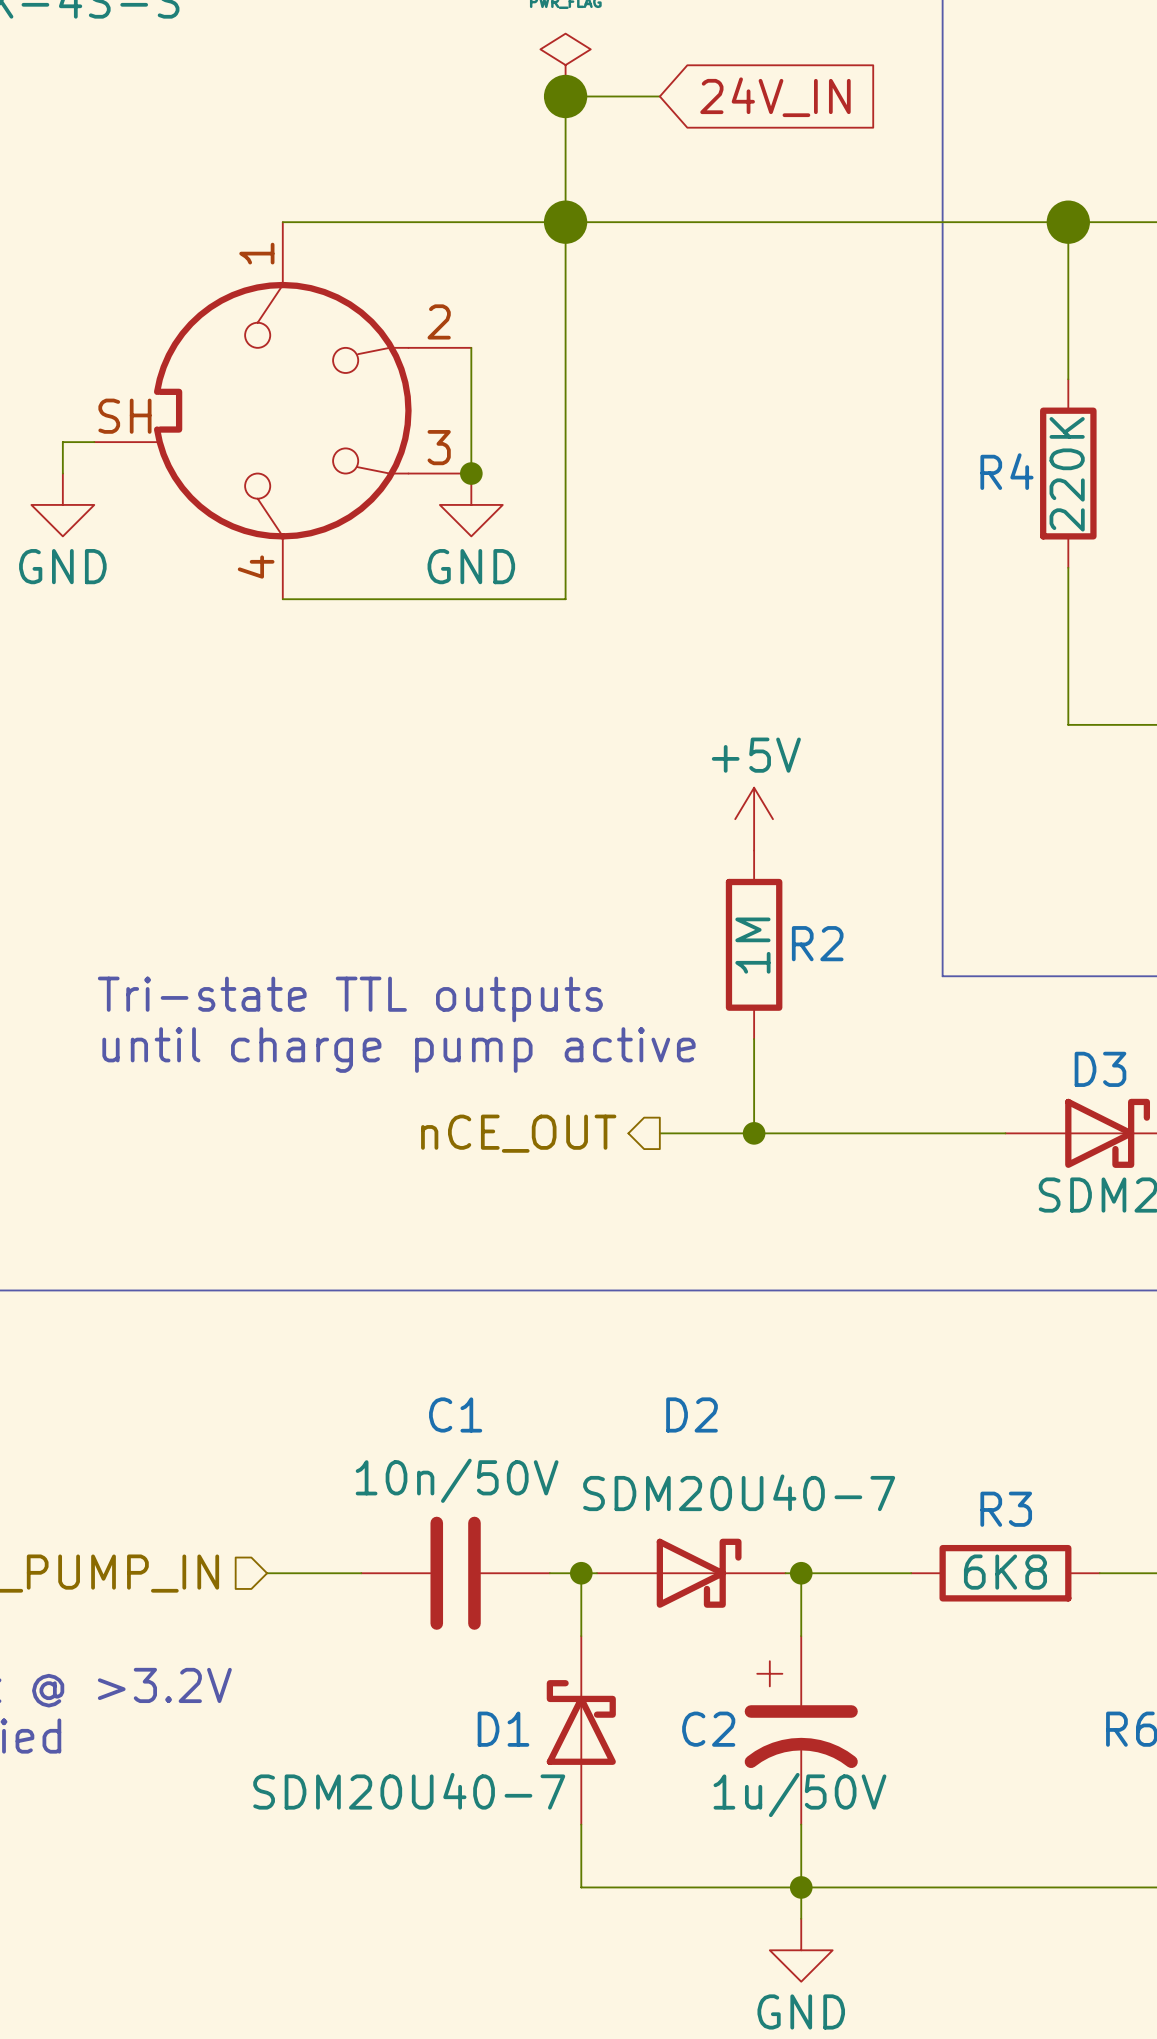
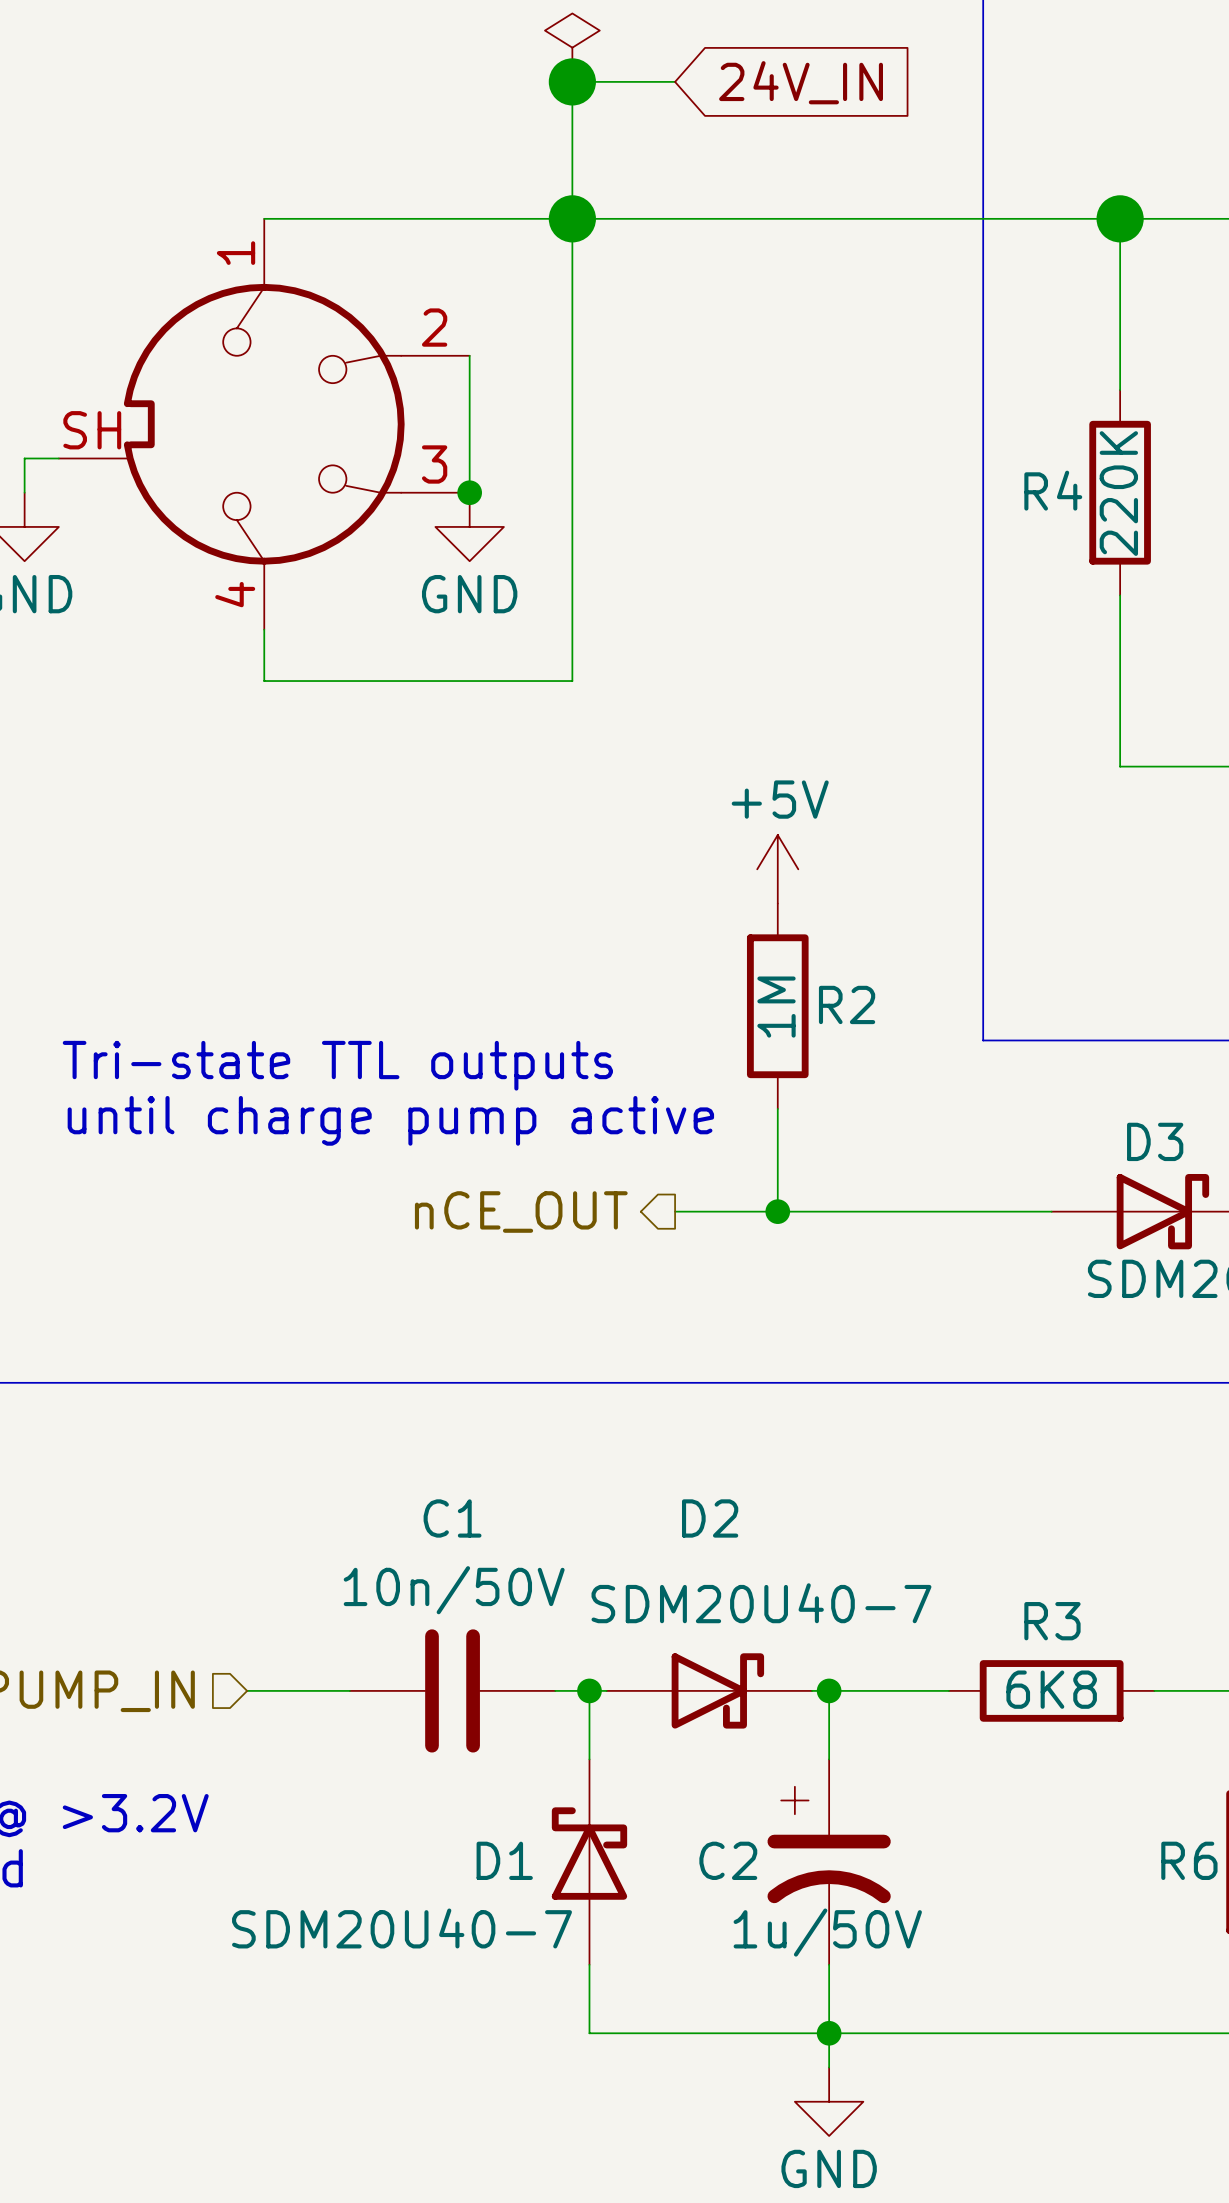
wire: (282, 599) (565, 599) -> (264, 629) (264, 681) (572, 681) (572, 629)

